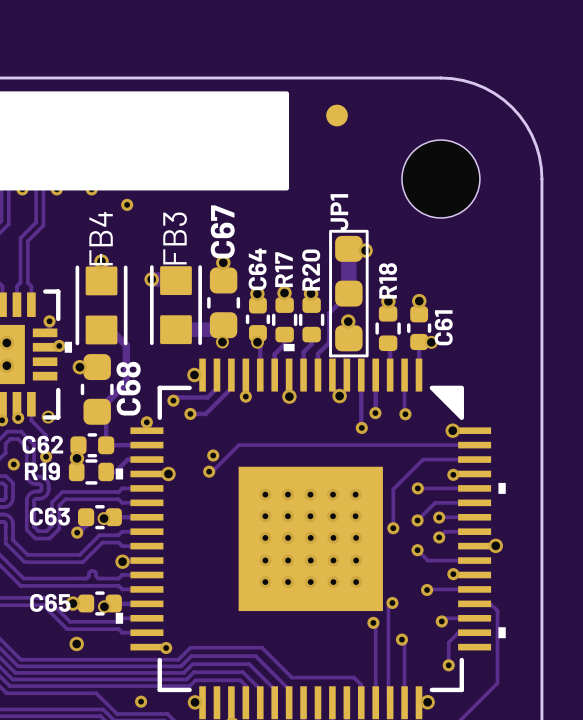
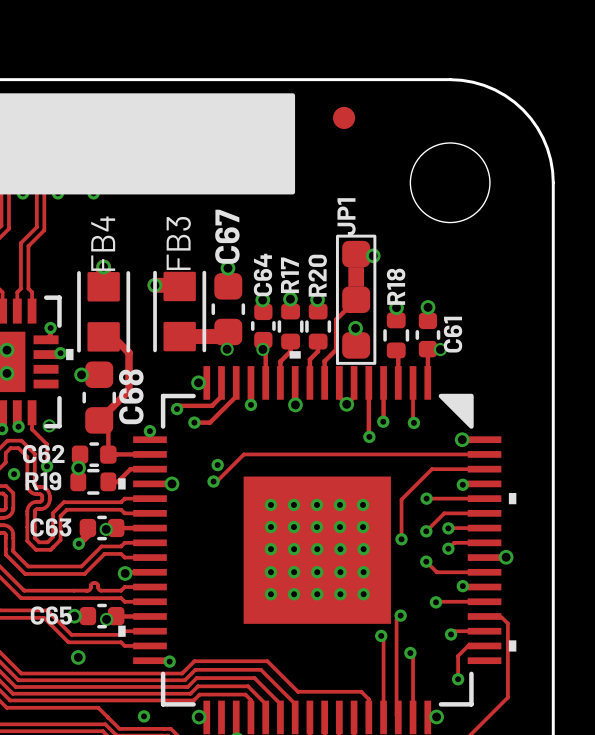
via: (127, 204) -> none

